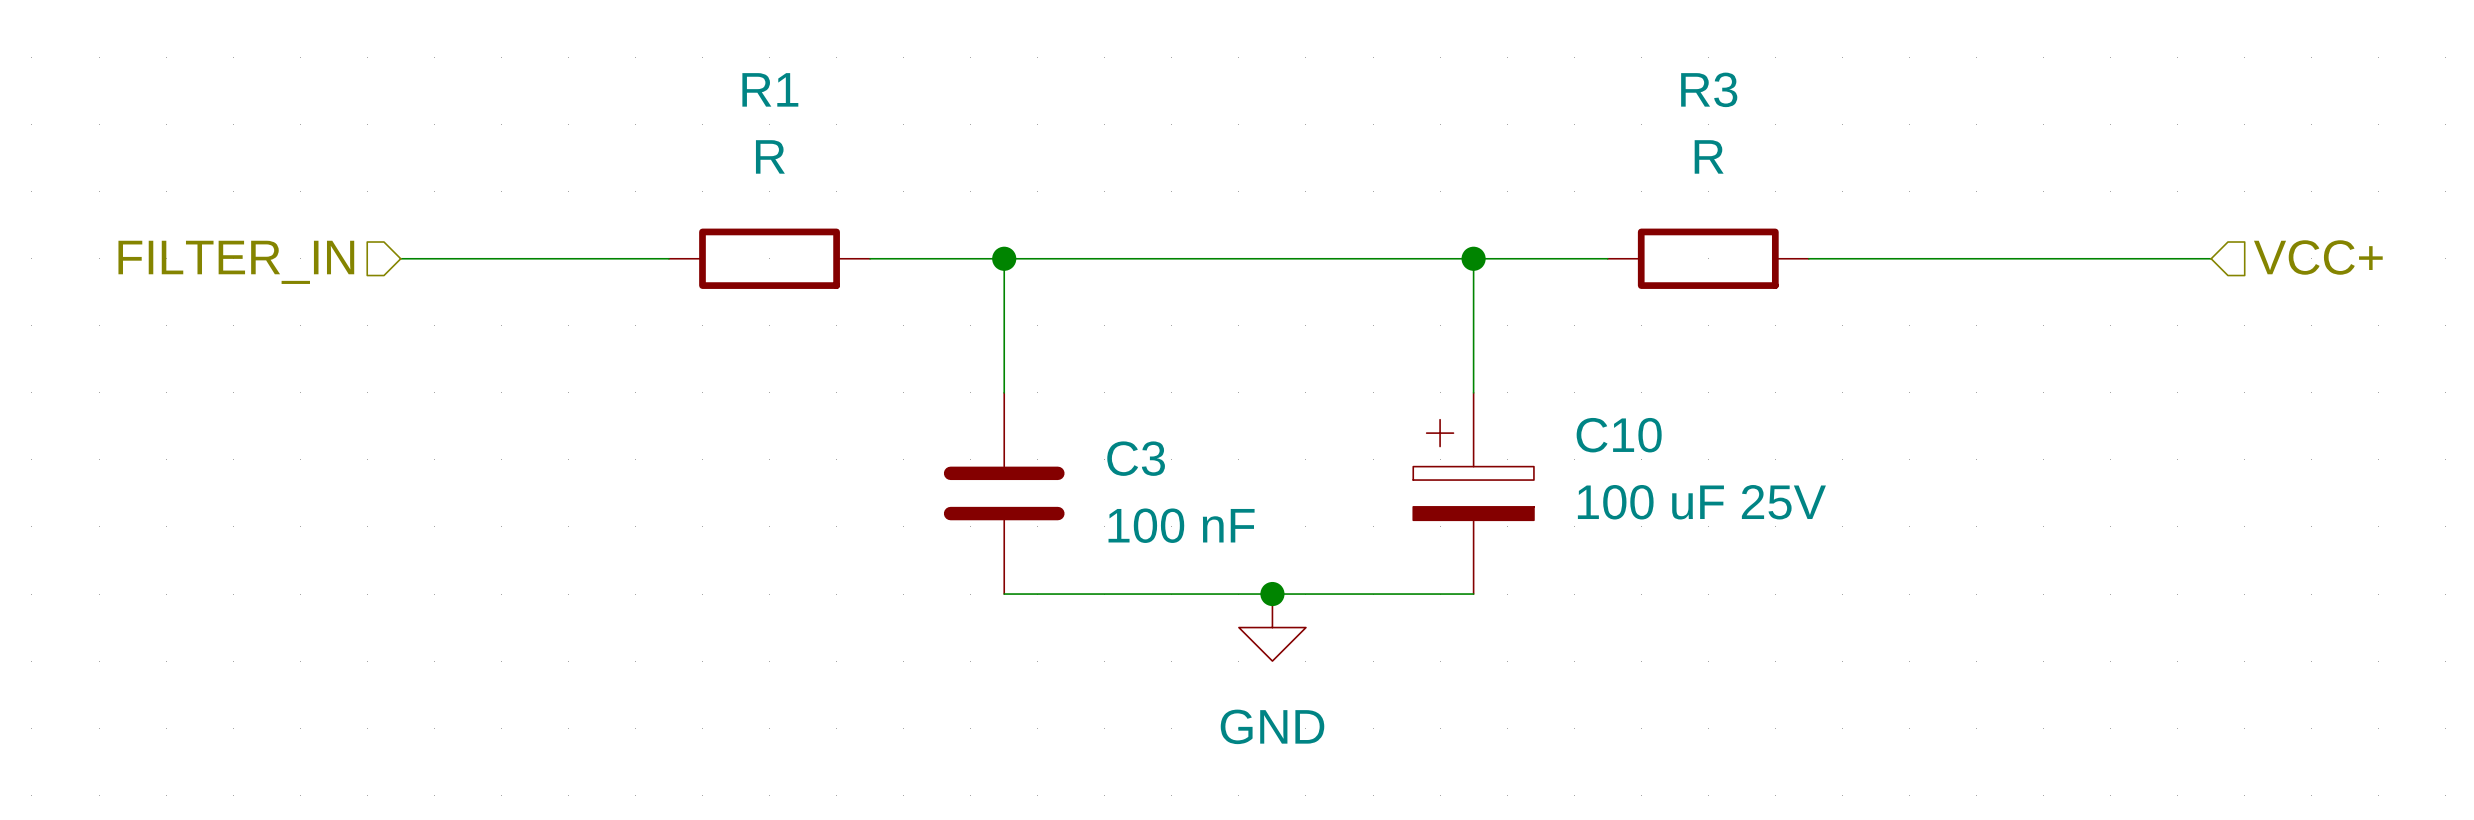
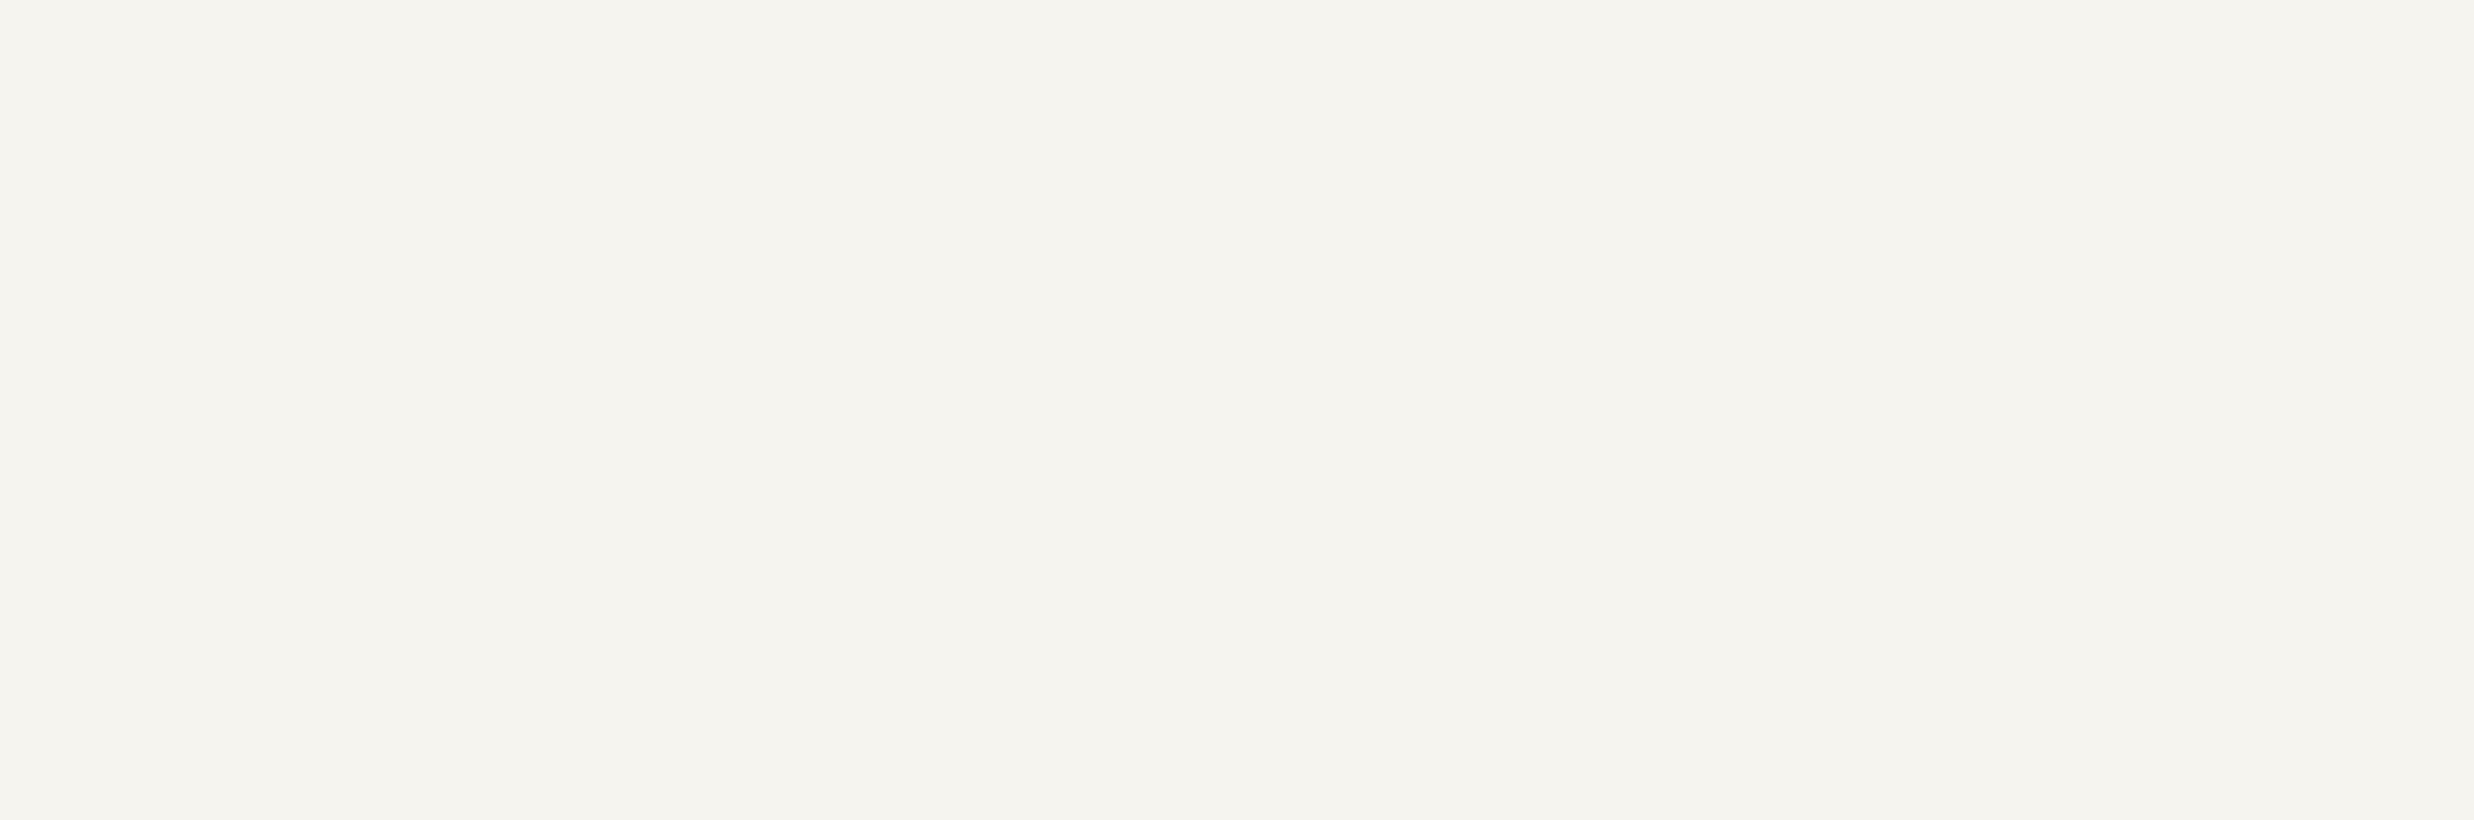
hierarchical label: VCC+ (2318, 257) -> none
wire: (400, 258) (668, 258) -> none
R1: R (769, 258) -> none
wire: (870, 258) (1607, 258) -> none
wire: (1004, 258) (1004, 392) -> none
junction: (1004, 258) -> none
wire: (1473, 258) (1473, 392) -> none
junction: (1473, 258) -> none
R3: R (1708, 258) -> none
wire: (1808, 258) (2211, 258) -> none
hierarchical label: FILTER_IN (236, 262) -> none
C3: 100 nF (1004, 493) -> none
C10: 100 uF 25V (1473, 493) -> none
wire: (1004, 594) (1473, 594) -> none
junction: (1272, 594) -> none
power symbol: GND (1272, 627) -> none

